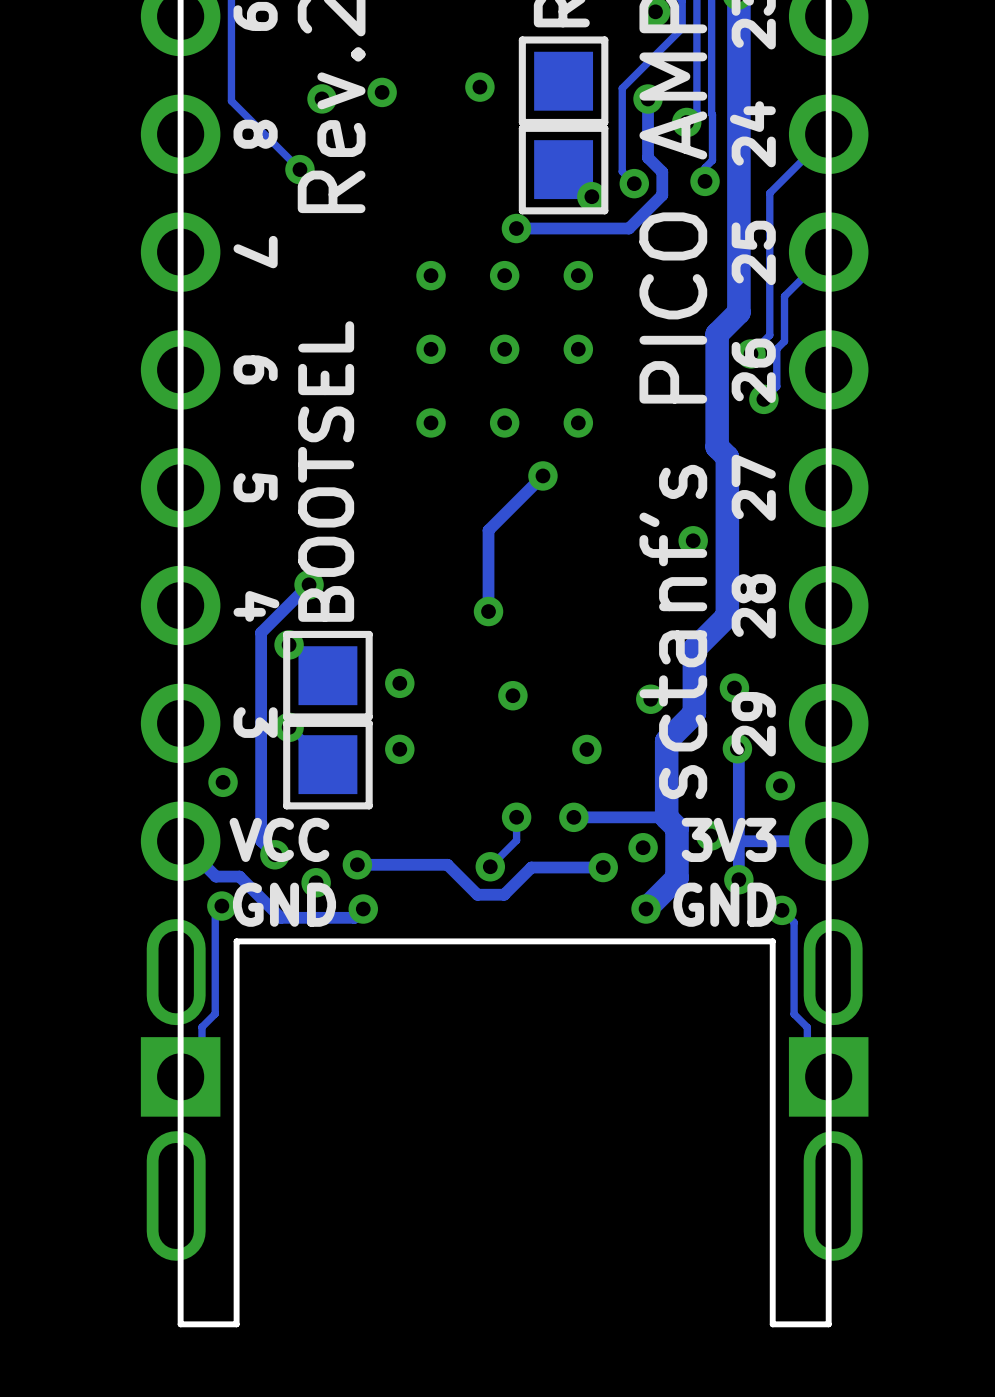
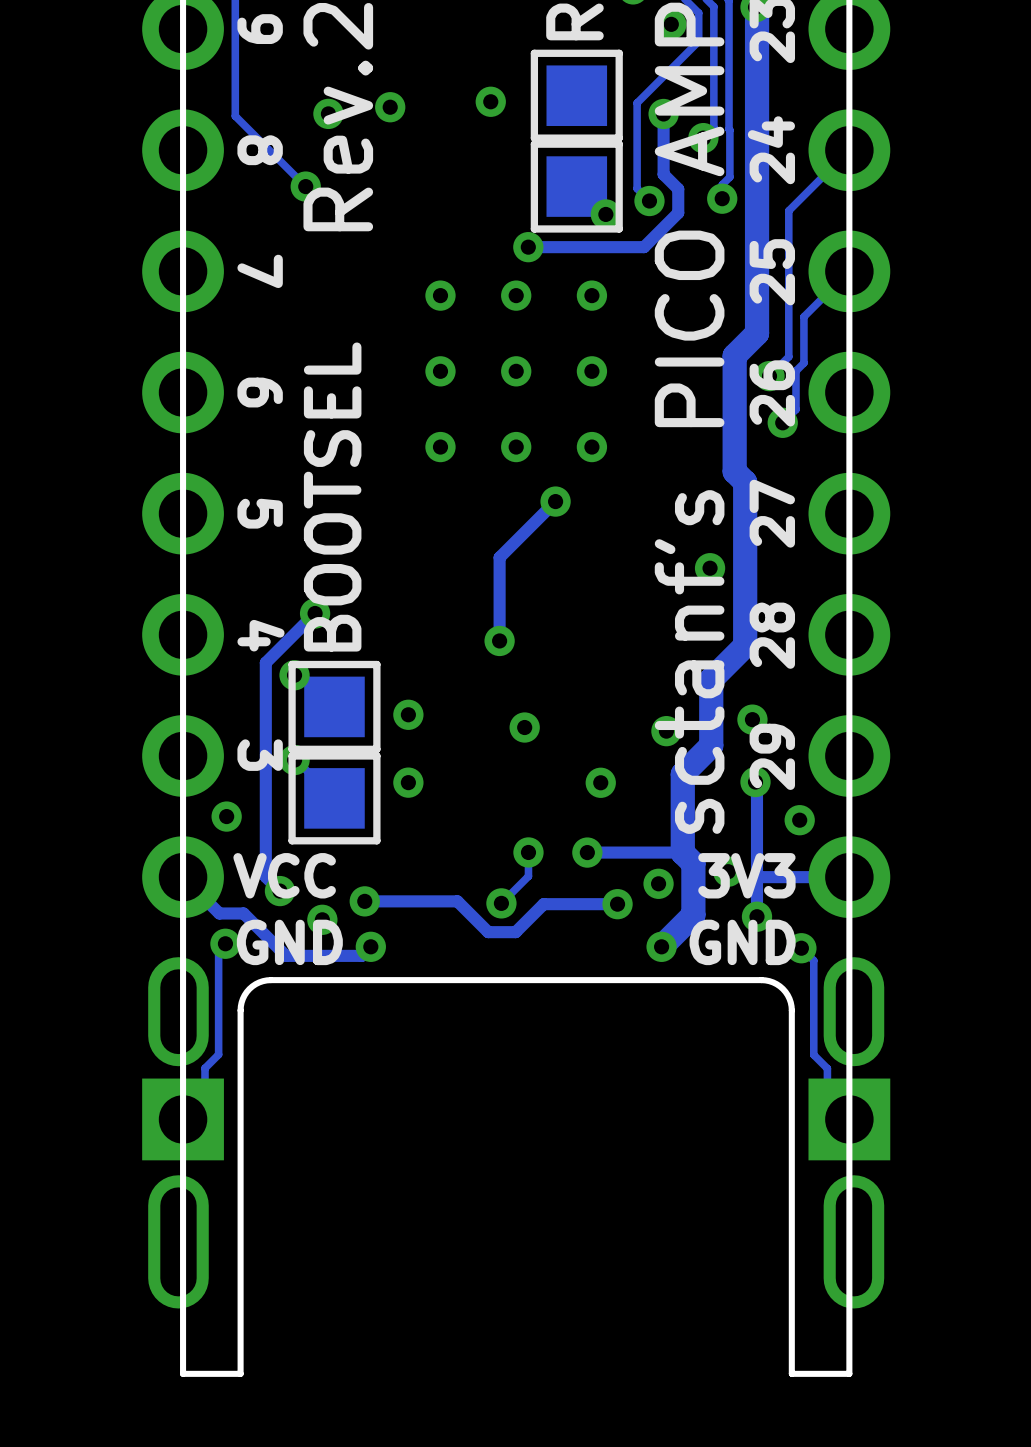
board edge: (266, 941) (236, 941) (236, 970) -> (270, 980) (259, 982) (249, 988) (242, 998) (240, 1010)
board edge: (743, 941) (772, 941) (772, 970) -> (761, 980) (773, 982) (782, 988) (789, 998) (791, 1010)

